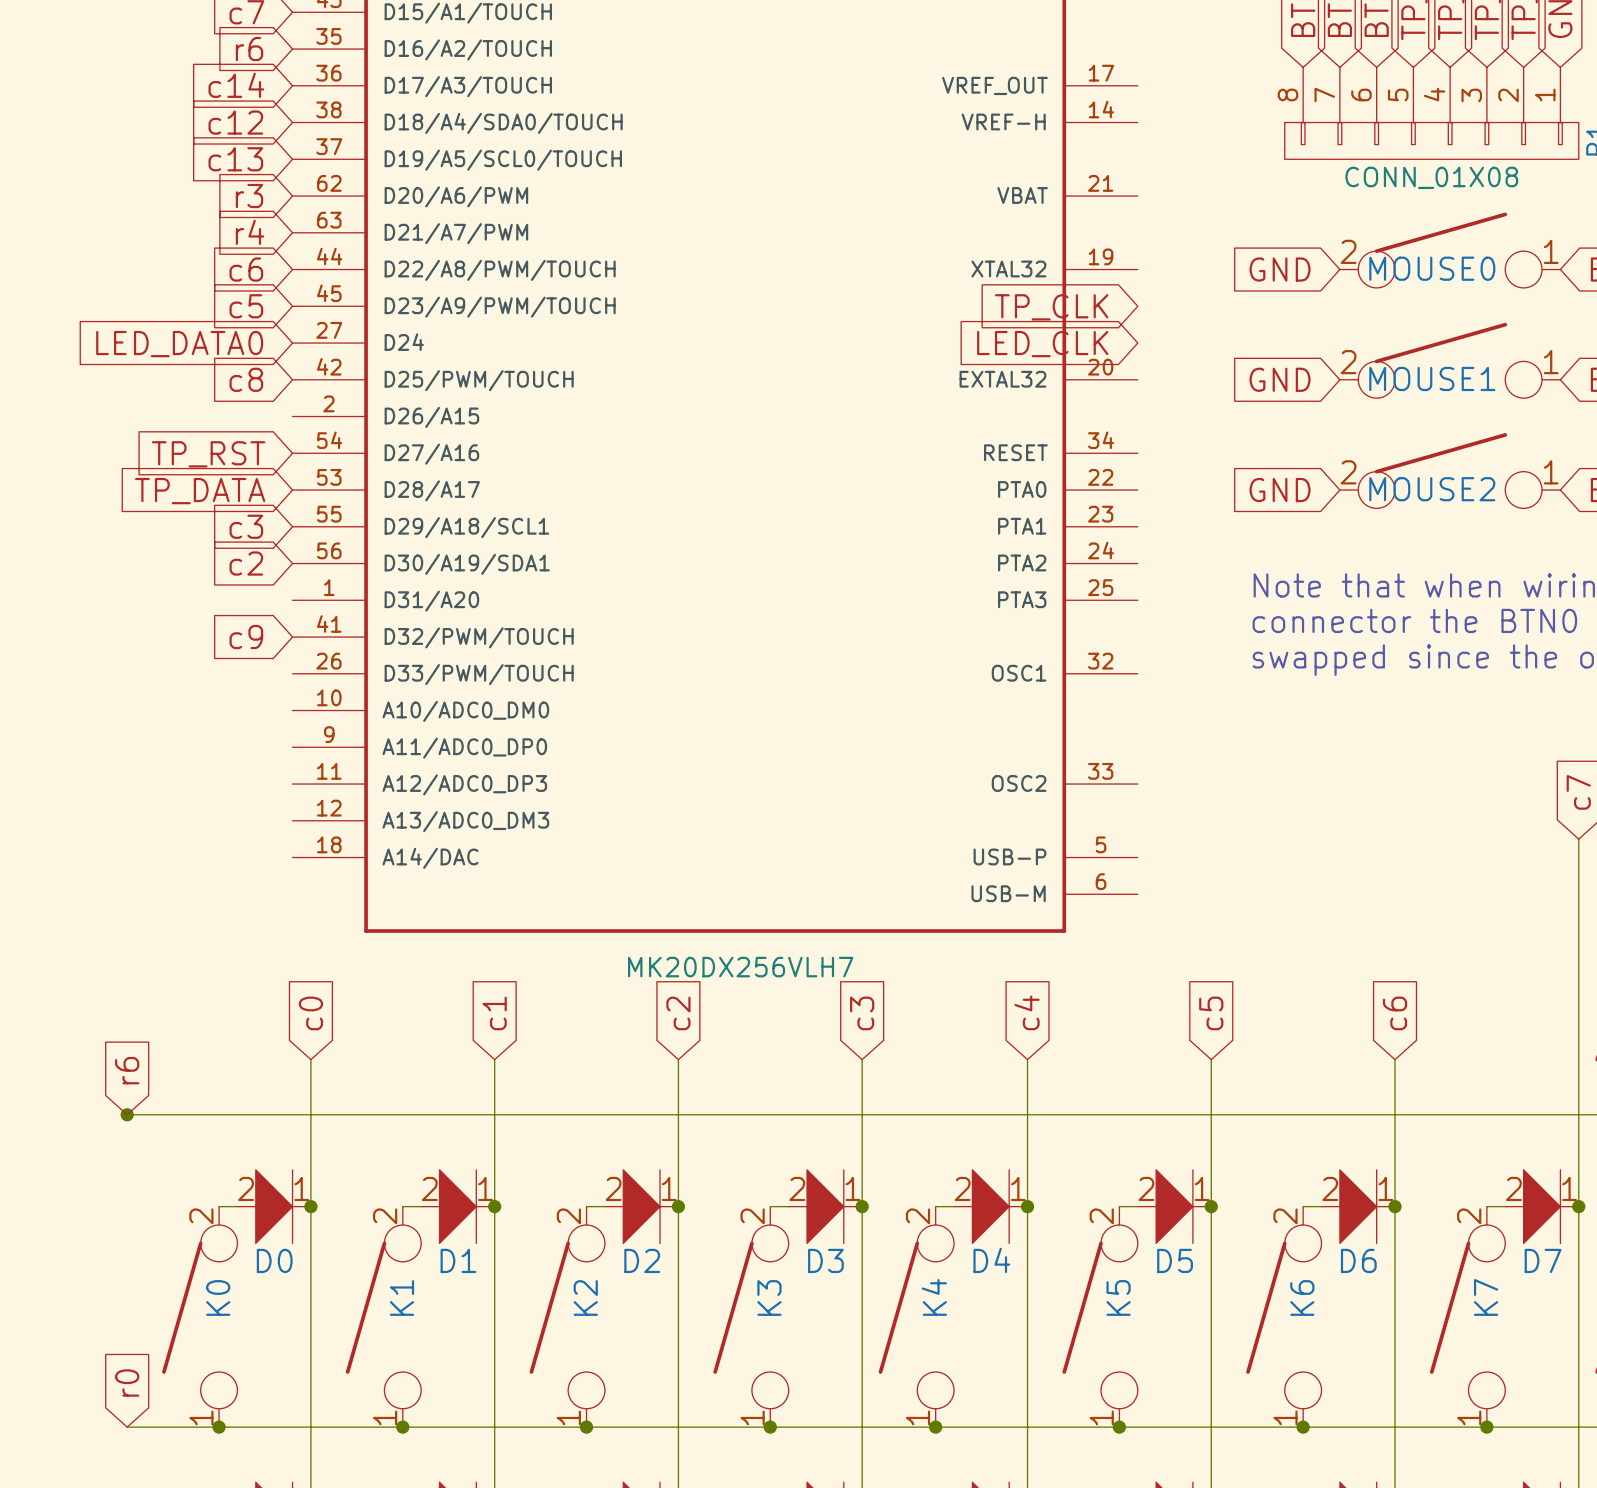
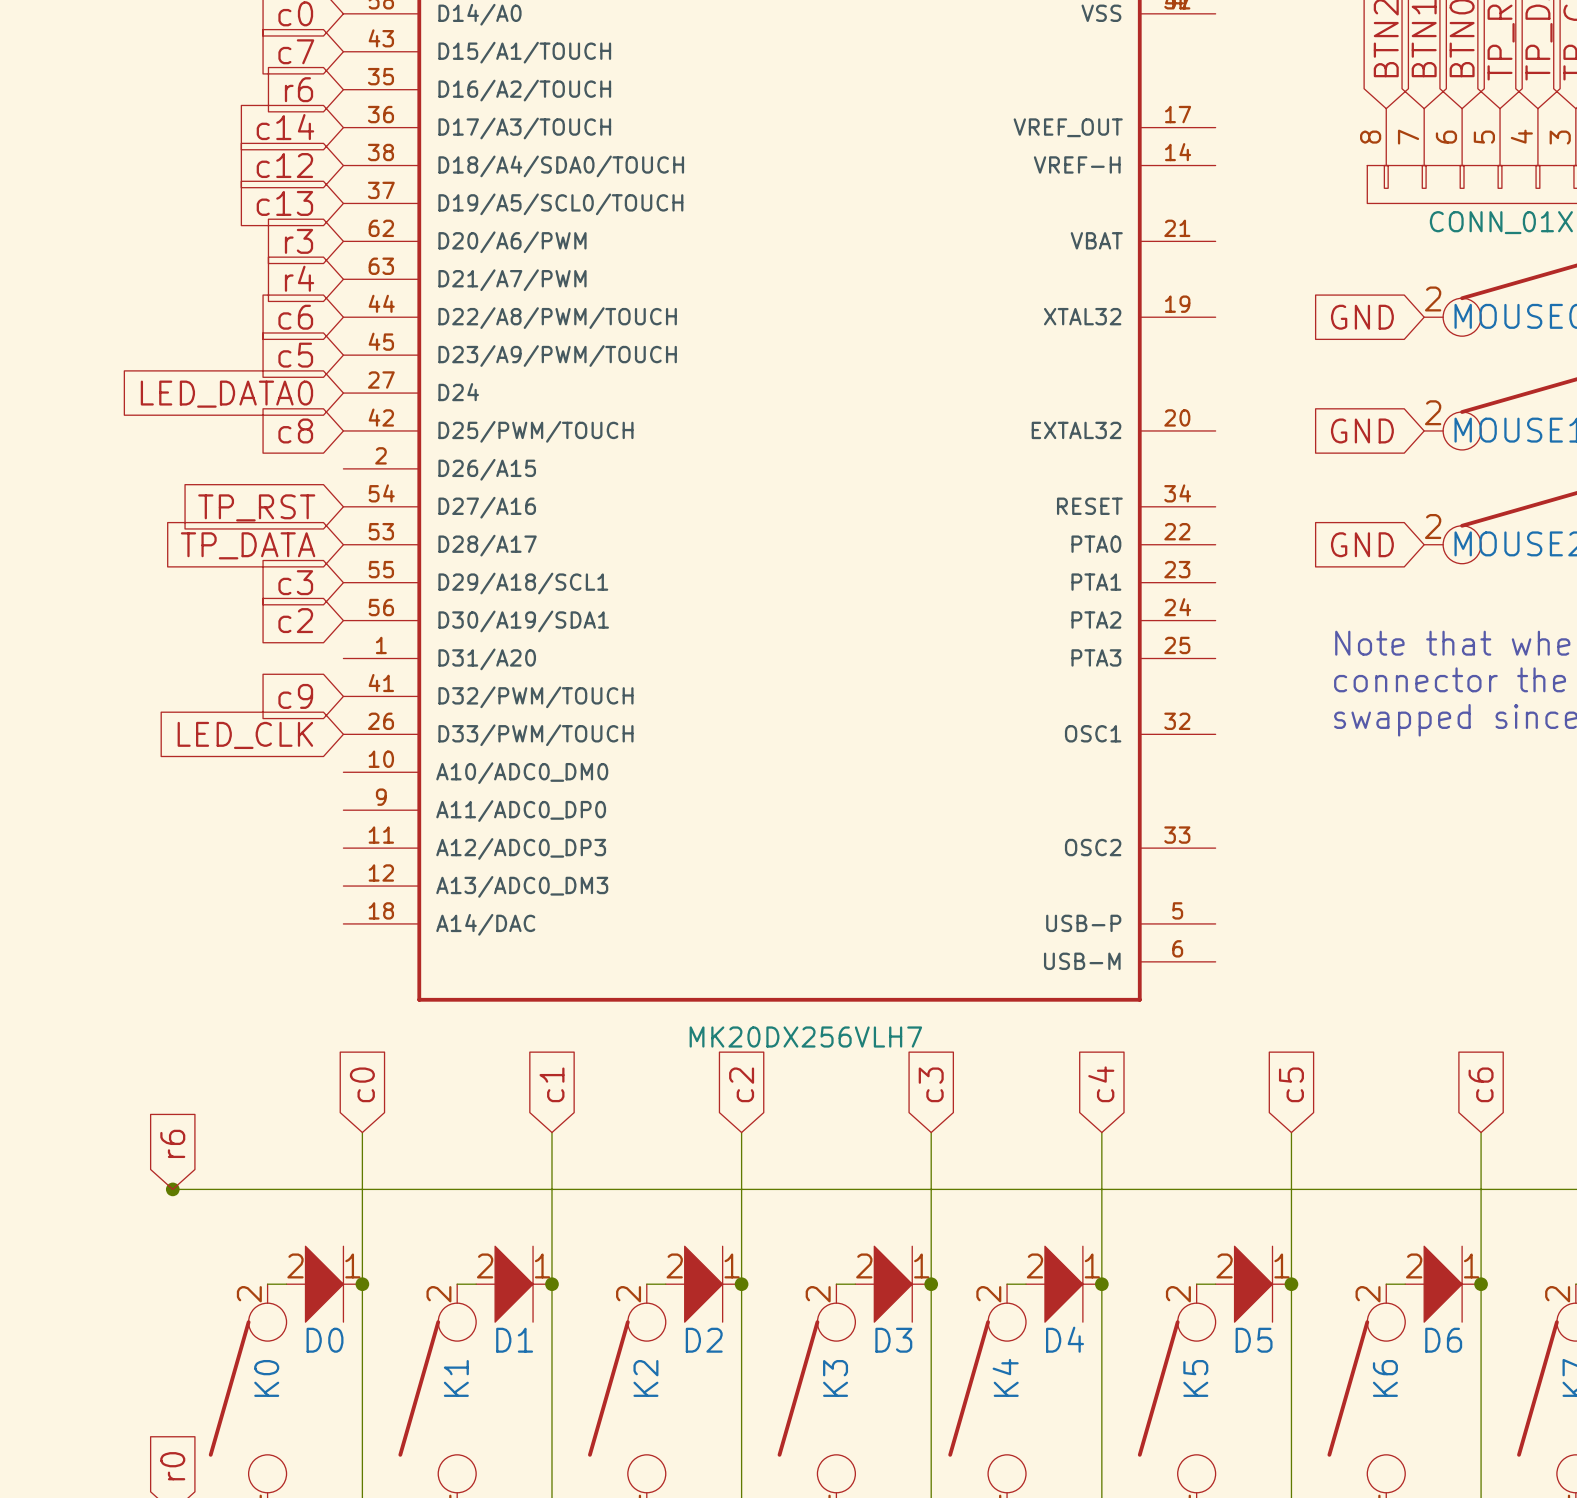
global label: TP_CLK (1051, 307) -> none
global label: LED_CLK (1042, 344) -> none
global label: none -> LED_CLK (245, 735)

